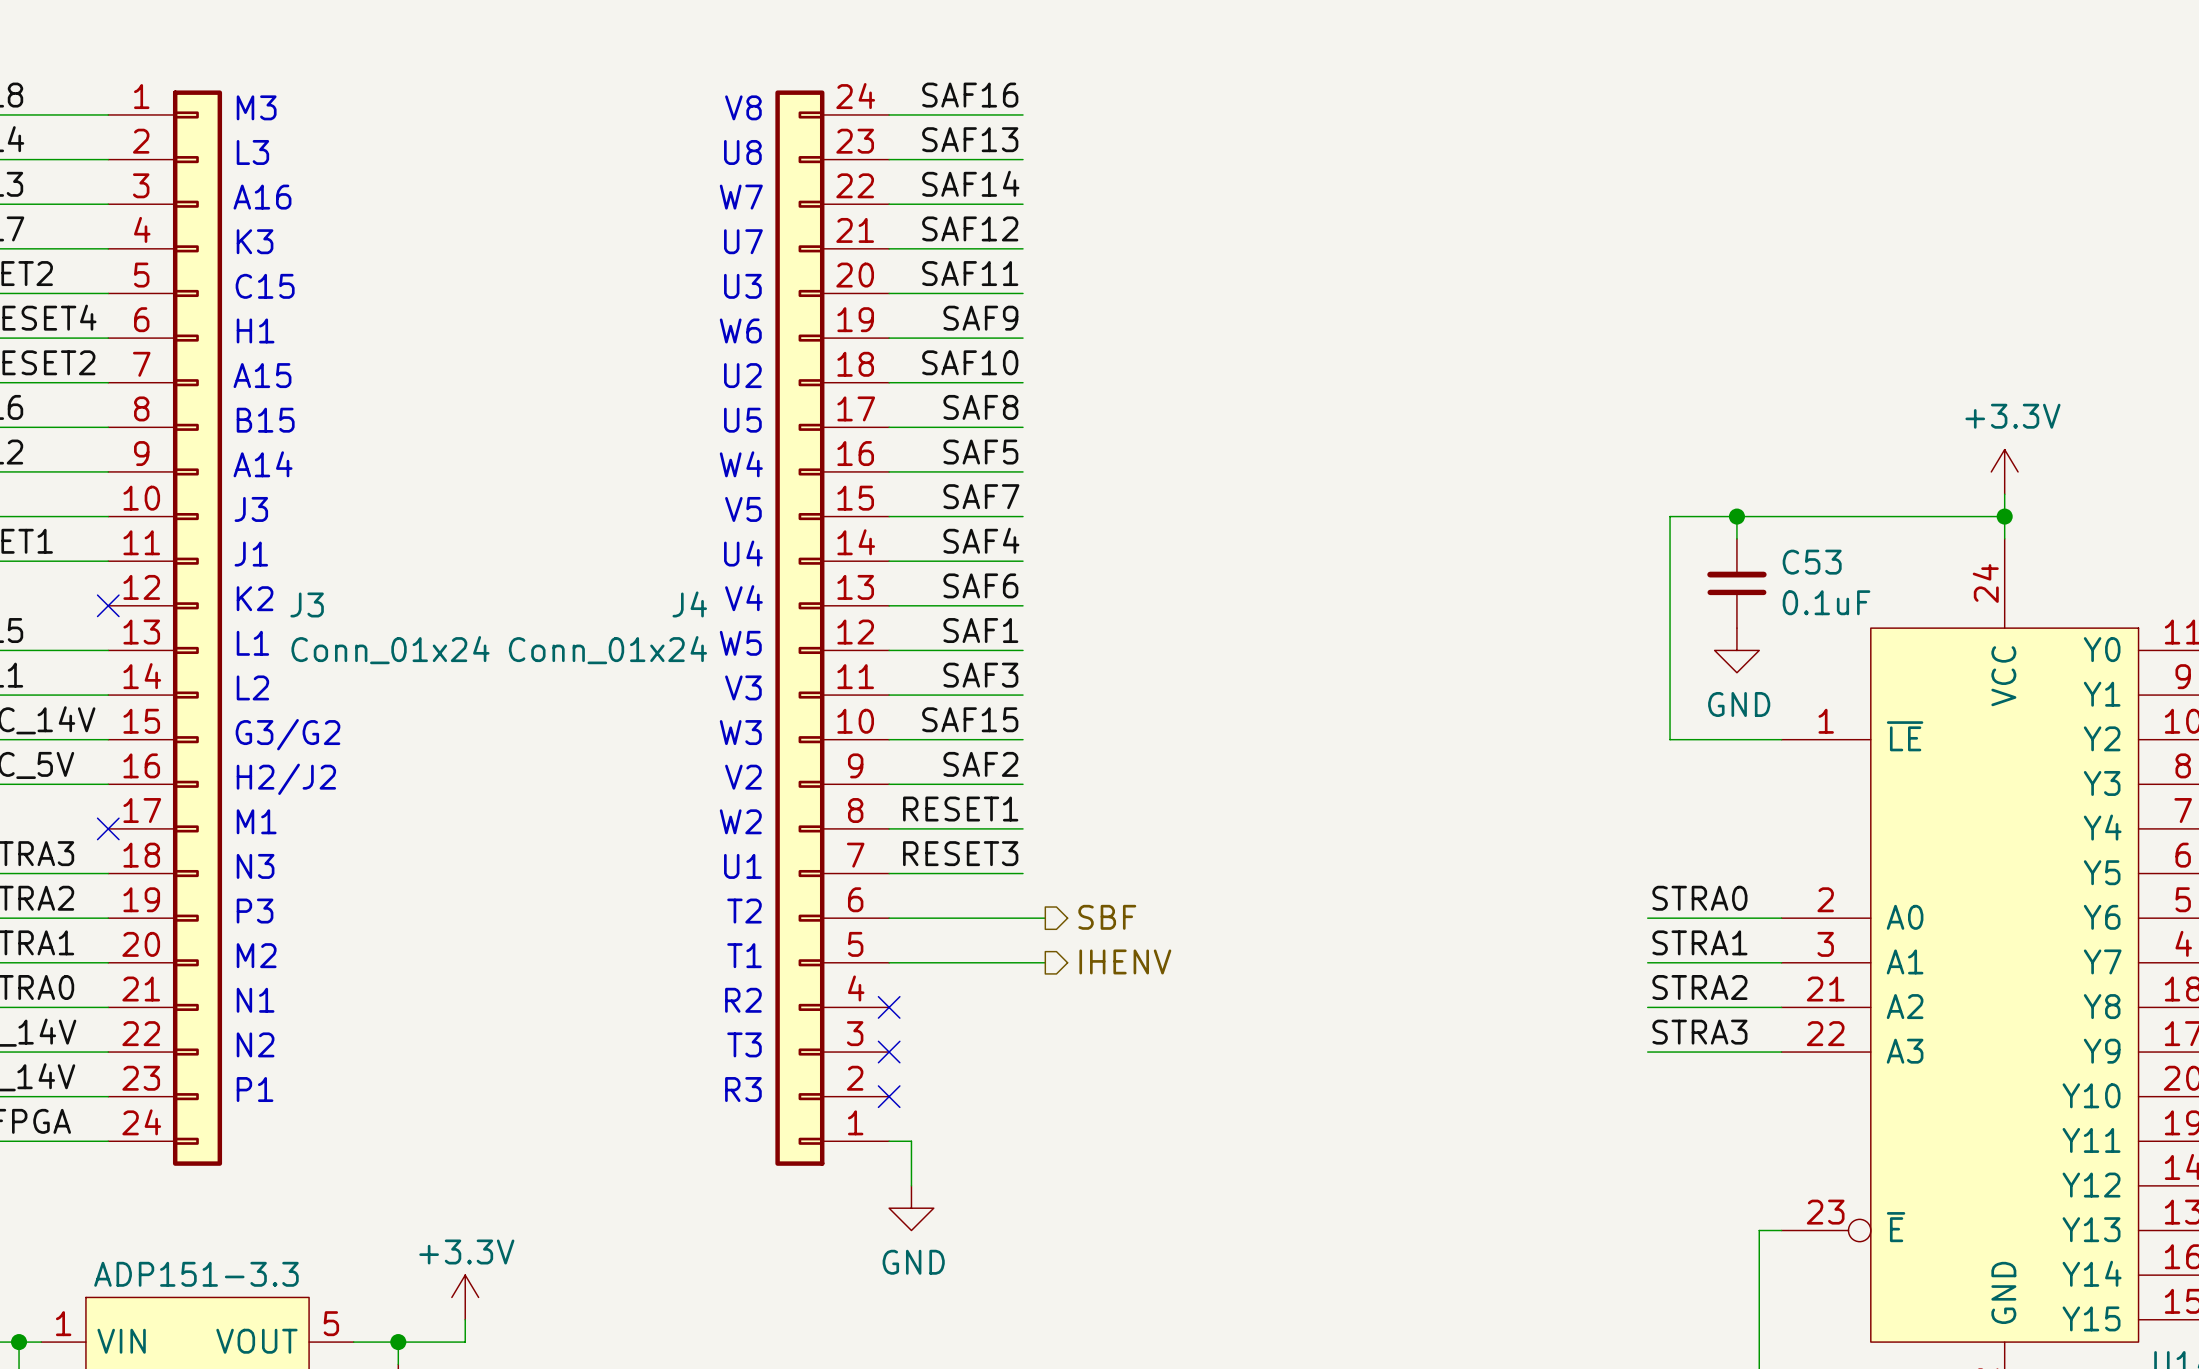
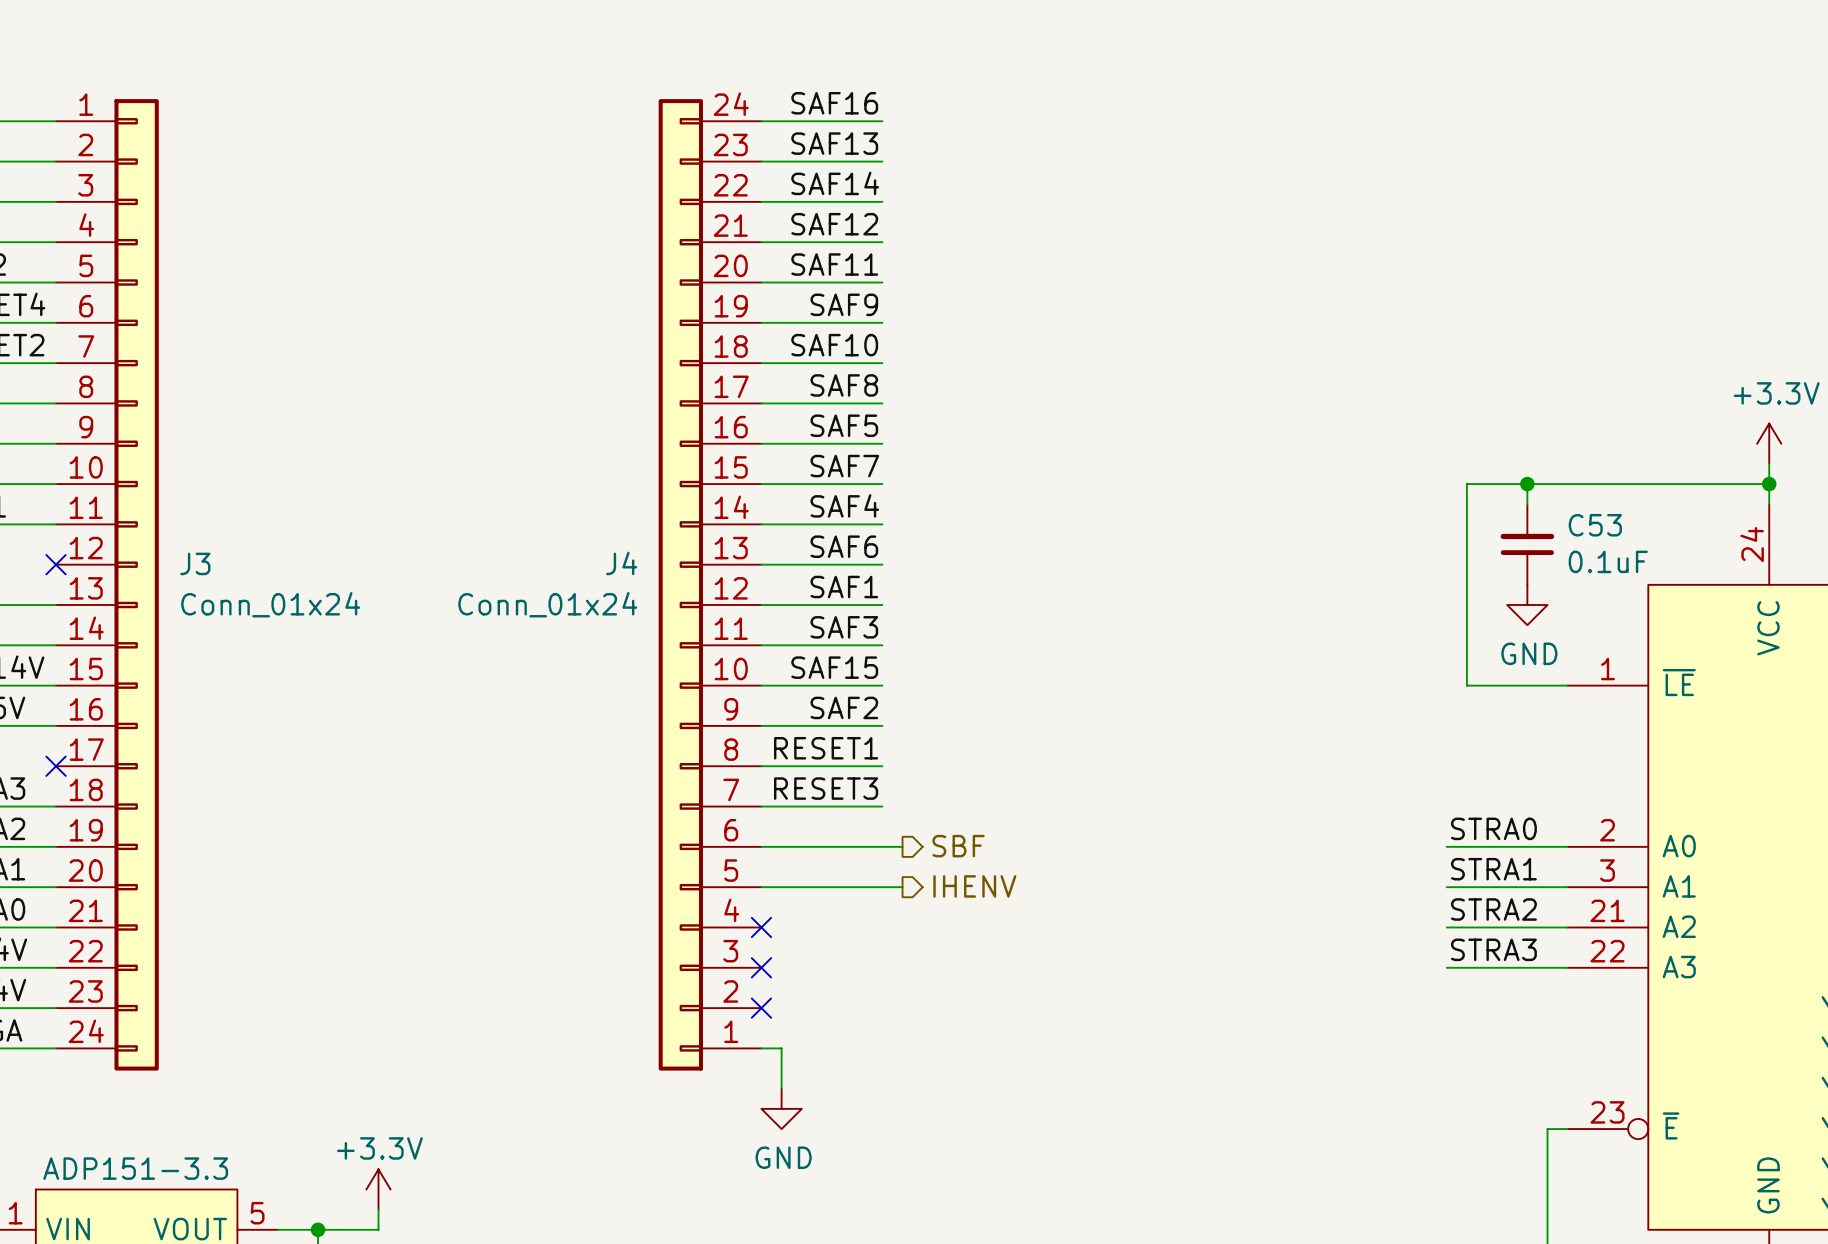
text: M3 (256, 107) -> none
text: V8 (743, 107) -> none
text: L3 (252, 152) -> none
text: U8 (742, 152) -> none
text: A16 (262, 197) -> none
text: W7 (741, 197) -> none
text: K3 (255, 241) -> none
text: U7 (743, 241) -> none
text: C15 (265, 286) -> none
text: U3 (742, 286) -> none
text: H1 (255, 330) -> none
text: W6 (740, 330) -> none
text: A15 (262, 375) -> none
text: U2 (742, 375) -> none
text: B15 (265, 420) -> none
text: U5 (742, 420) -> none
text: A14 (263, 464) -> none
text: W4 (741, 464) -> none
text: J3 (251, 509) -> none
text: V5 (743, 509) -> none
text: U4 (743, 553) -> none
text: J1 (251, 554) -> none
text: K2 (255, 598) -> none
text: V4 (743, 598) -> none
J3 name position: J3 (307, 604) -> J3 (195, 563)
J4 name position: J4 (689, 604) -> J4 (621, 563)
text: L1 (252, 643) -> none
text: W5 (740, 643) -> none
J3 value position: Conn_01x24 (390, 650) -> Conn_01x24 (270, 604)
J4 value position: Conn_01x24 (607, 650) -> Conn_01x24 (547, 604)
text: L2 (252, 687) -> none
text: V3 (743, 687) -> none
text: W3 (740, 732) -> none
text: G3/G2 (287, 734) -> none
text: V2 (743, 777) -> none
text: H2/J2 (286, 779) -> none
text: M1 (256, 821) -> none
text: W2 (740, 821) -> none
text: N3 (255, 866) -> none
text: U1 (742, 866) -> none
text: P3 (255, 911) -> none
text: T2 (744, 911) -> none
text: M2 (256, 955) -> none
text: T1 (744, 955) -> none
text: N1 (255, 1000) -> none
text: R2 (743, 1000) -> none
text: N2 (255, 1044) -> none
text: T3 (744, 1044) -> none
text: P1 (255, 1089) -> none
text: R3 (743, 1089) -> none

